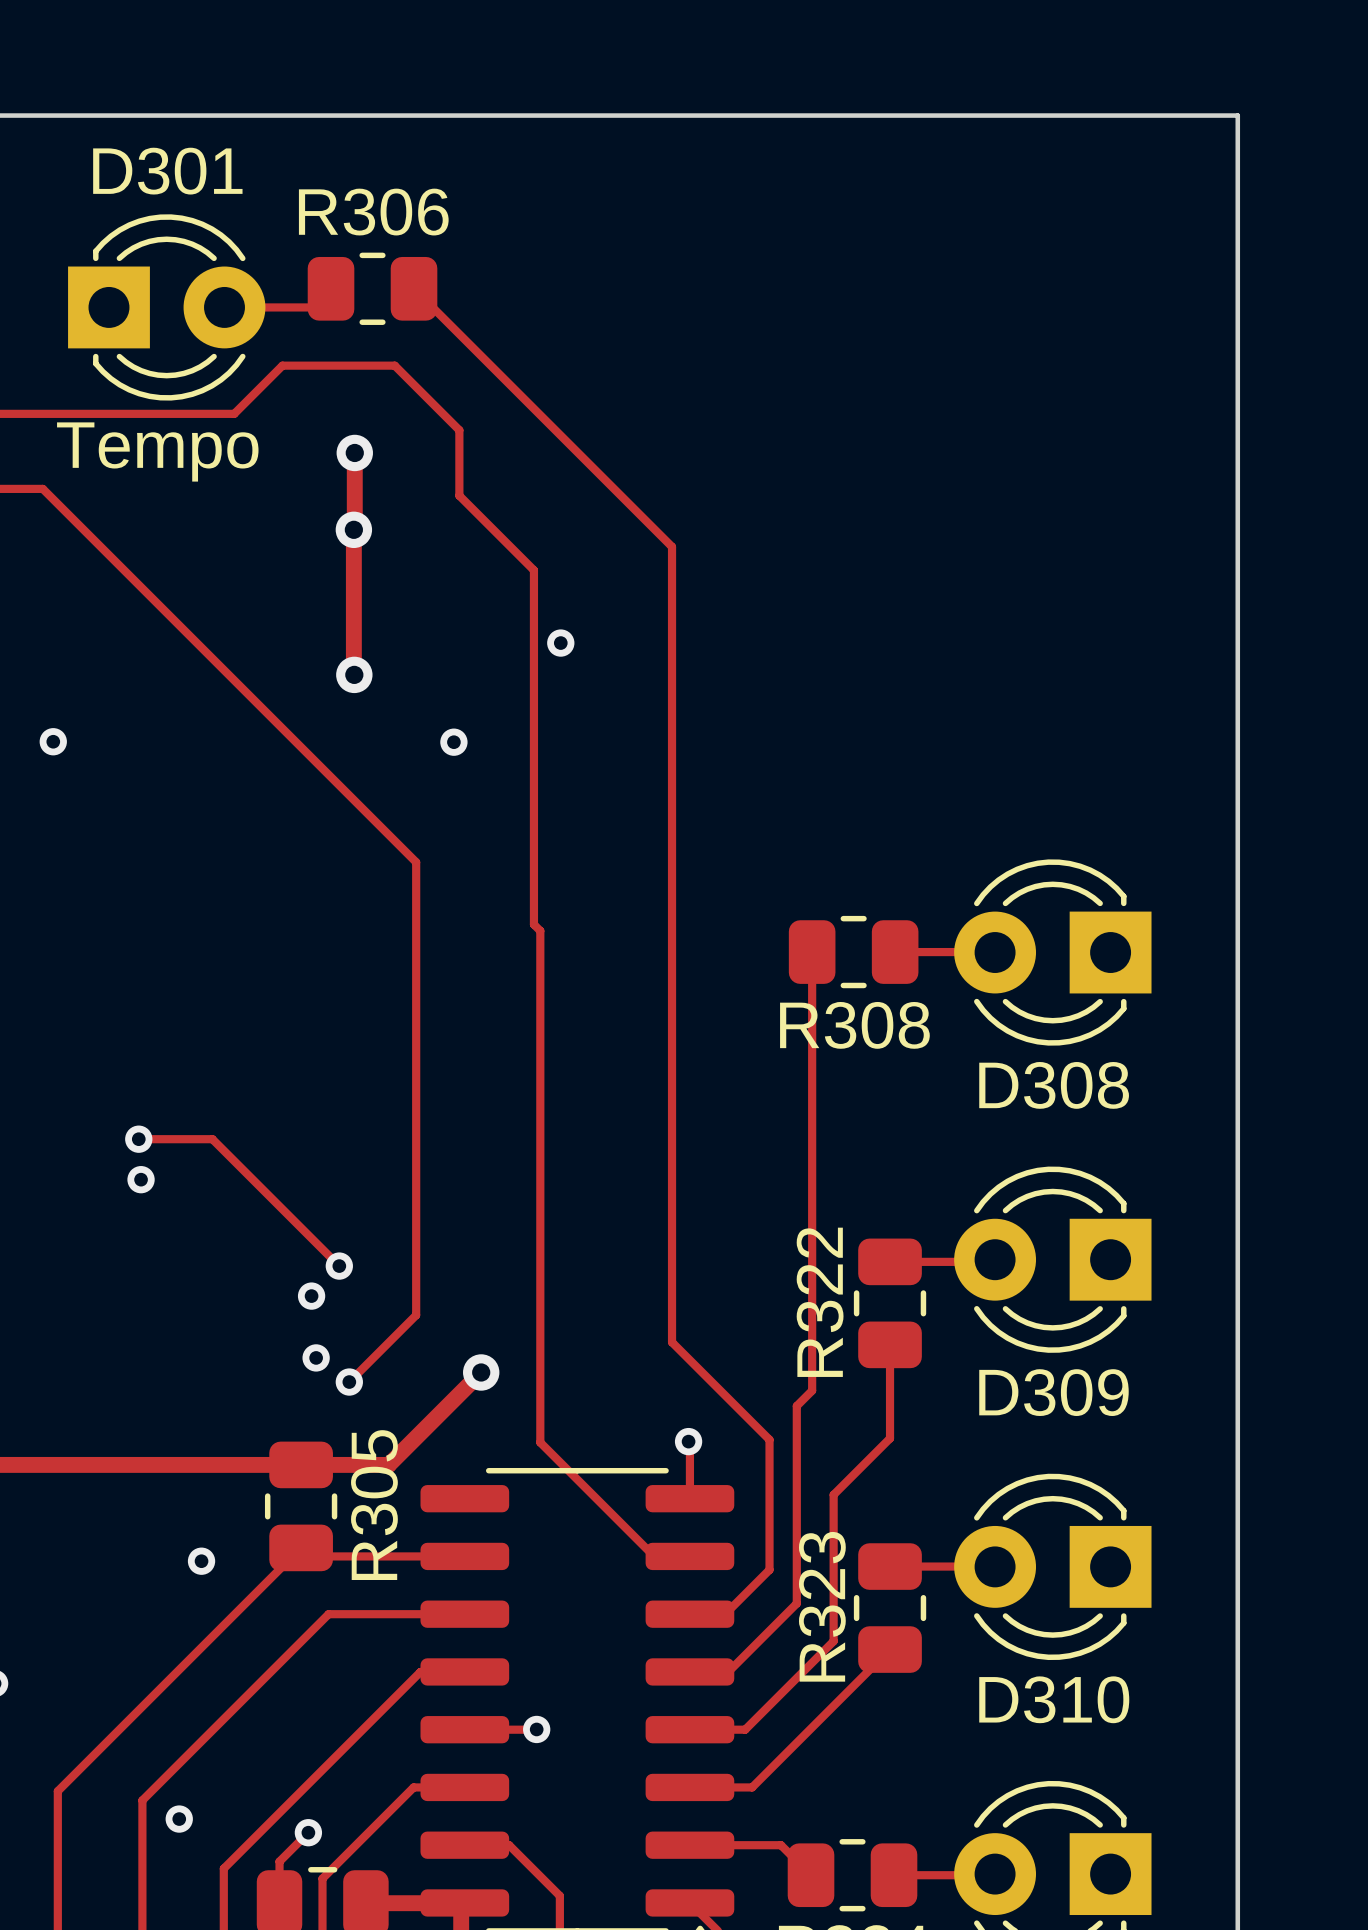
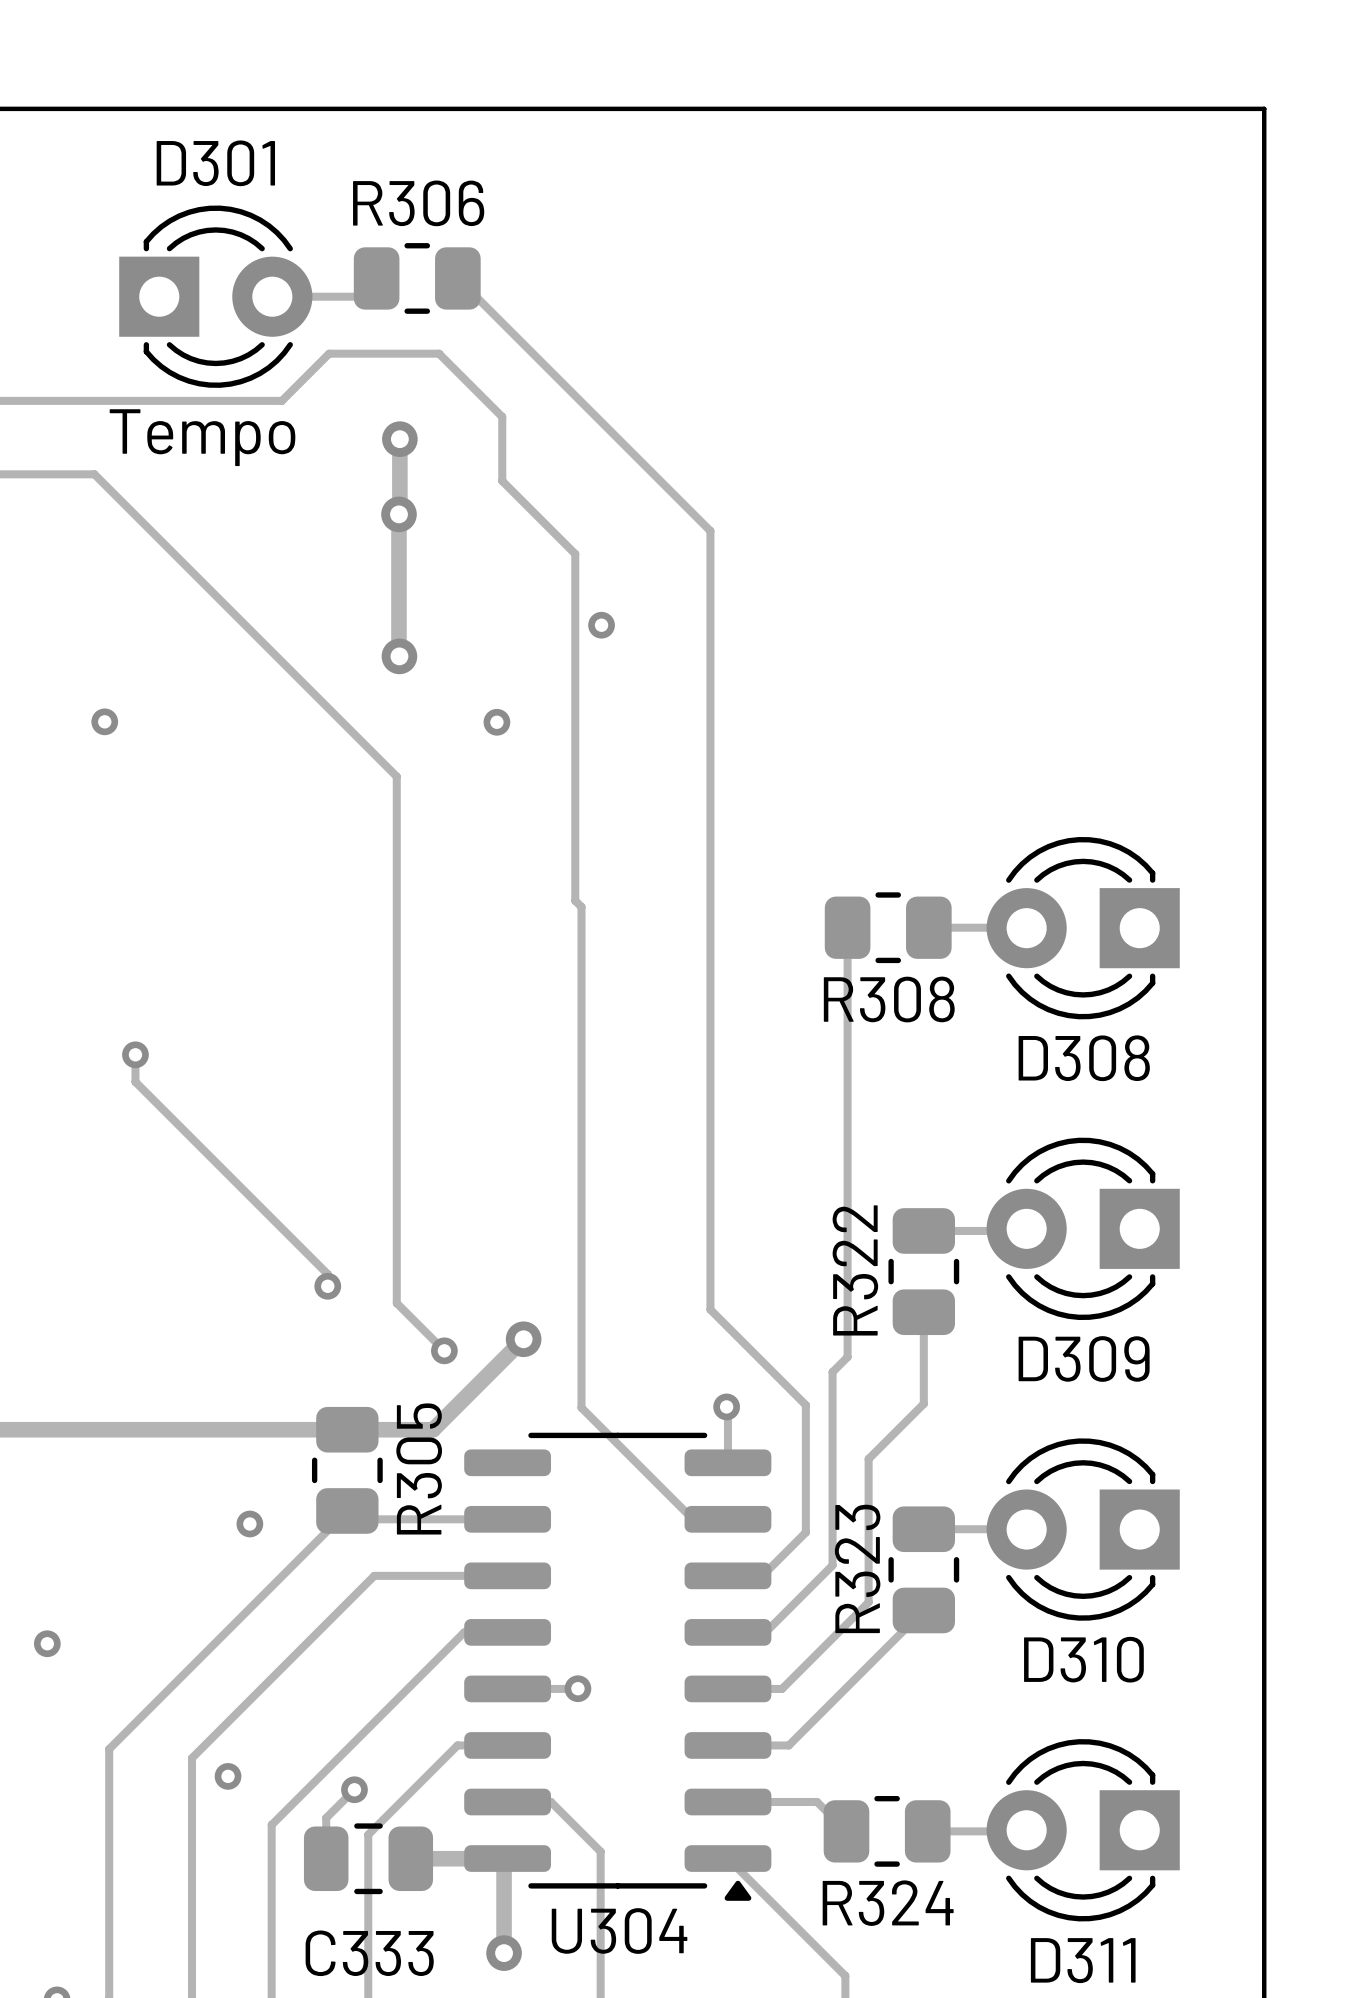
track: (351, 797) (416, 862) (416, 1315) (349, 1382) -> (396, 776) (396, 1303) (444, 1350)
track: none -> (135, 1054) (135, 1081) (327, 1274) (327, 1286)
via: none -> (135, 1054)
track: (138, 1139) (212, 1139) (339, 1266) -> none
via: (138, 1139) -> none
via: (141, 1179) -> none
via: (339, 1266) -> none
via: (311, 1296) -> none
via: none -> (327, 1286)
via: (316, 1357) -> none
via: (349, 1382) -> none
via: none -> (444, 1350)

